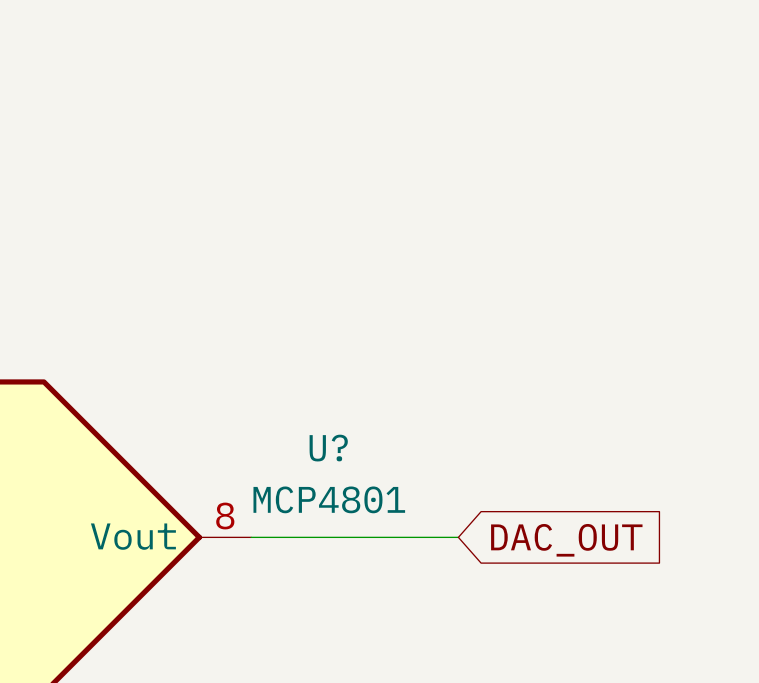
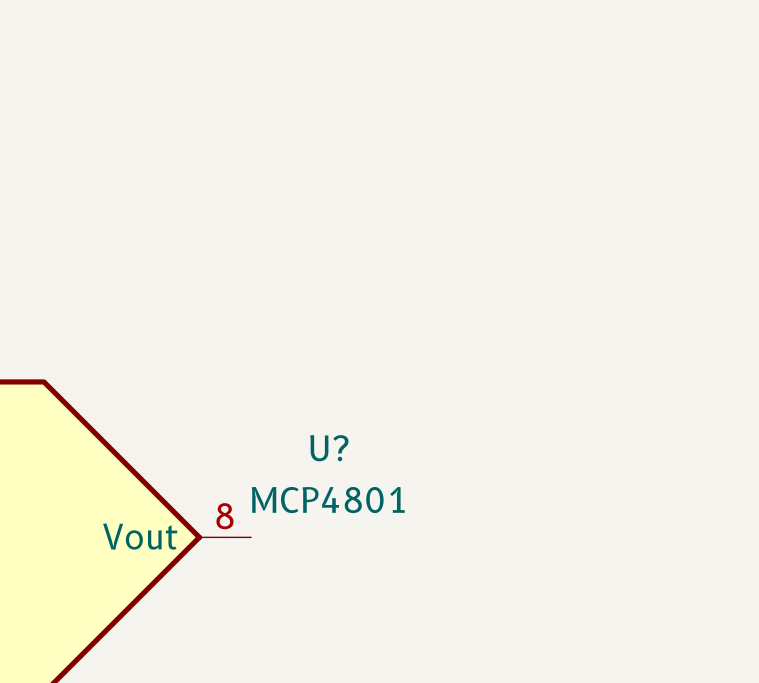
wire: (251, 537) (458, 537) -> none
global label: DAC_OUT (566, 540) -> none

